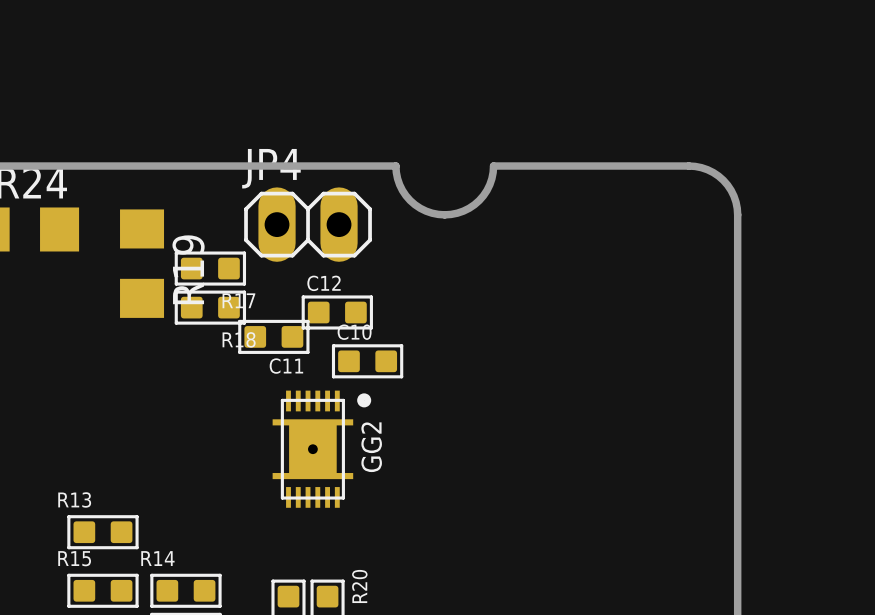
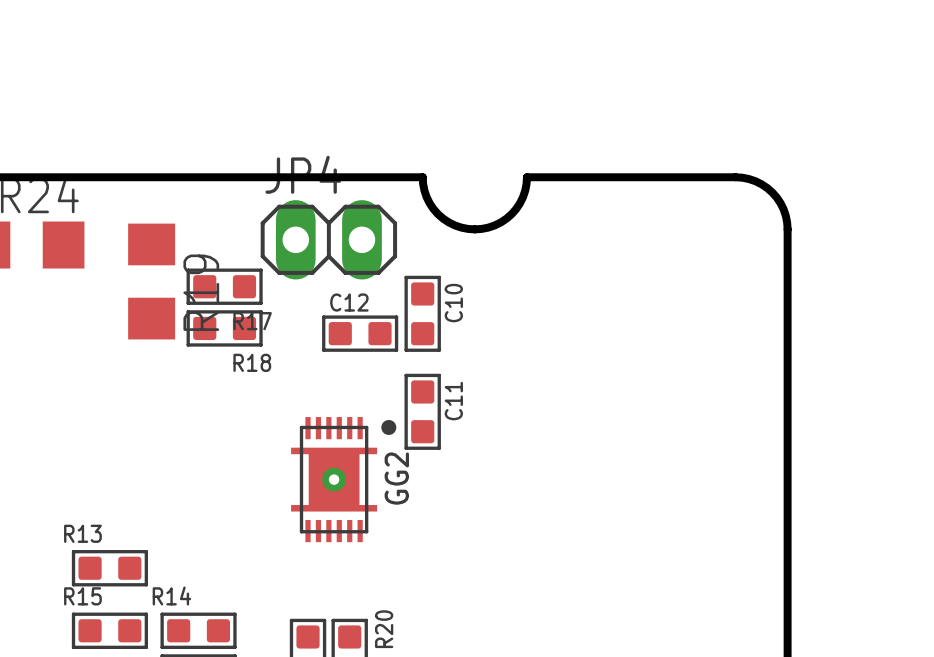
C11 rotation: 0° (273, 336) -> 90° clockwise (422, 411)
C11 position: (273, 336) -> (422, 411)
C10 rotation: 0° (367, 361) -> 90° clockwise (422, 313)
C10 position: (367, 361) -> (422, 313)

